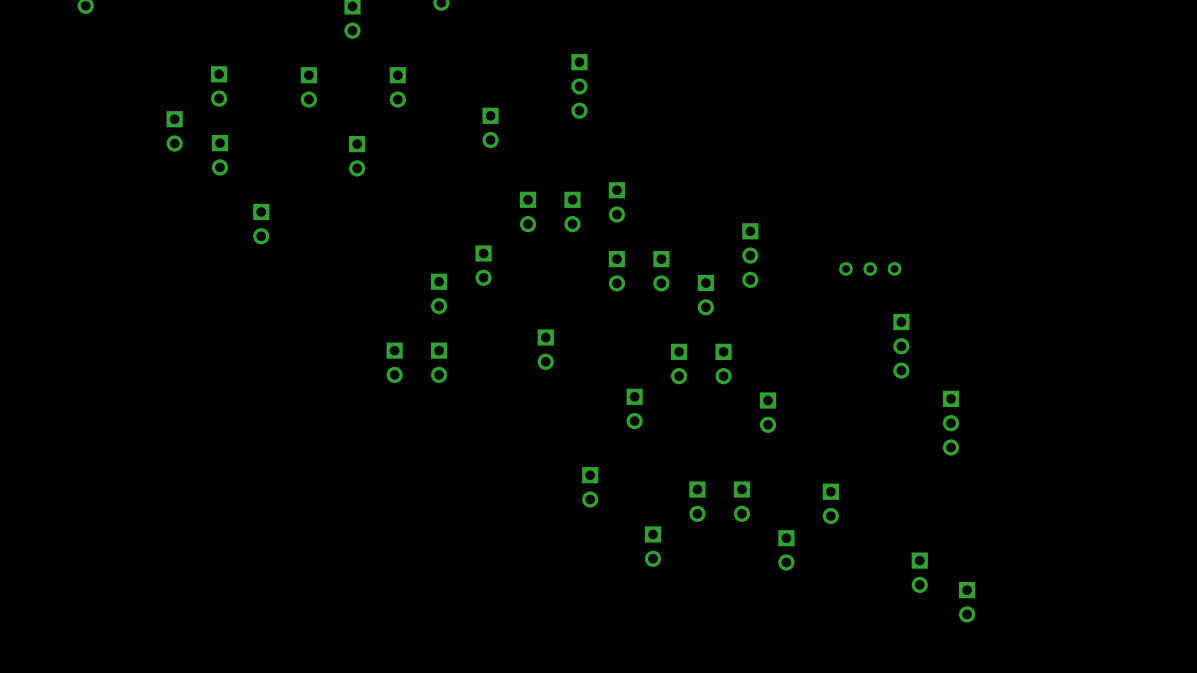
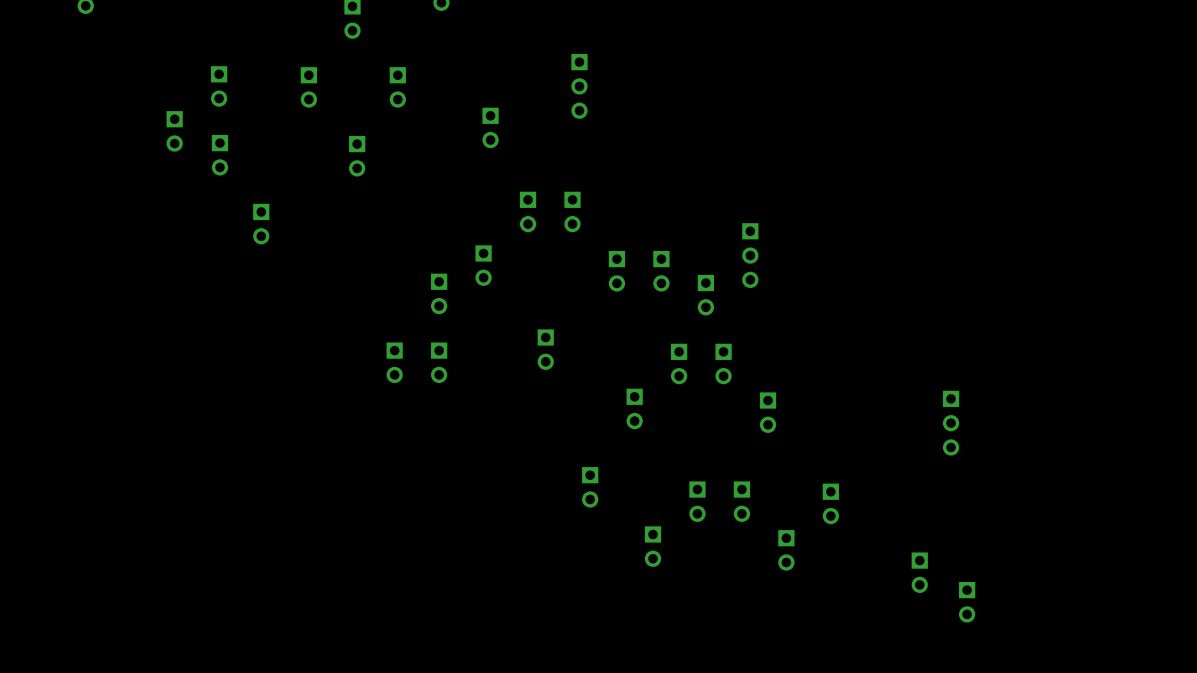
part: (616, 202) -> none
part: (870, 268) -> none
part: (901, 346) -> none

